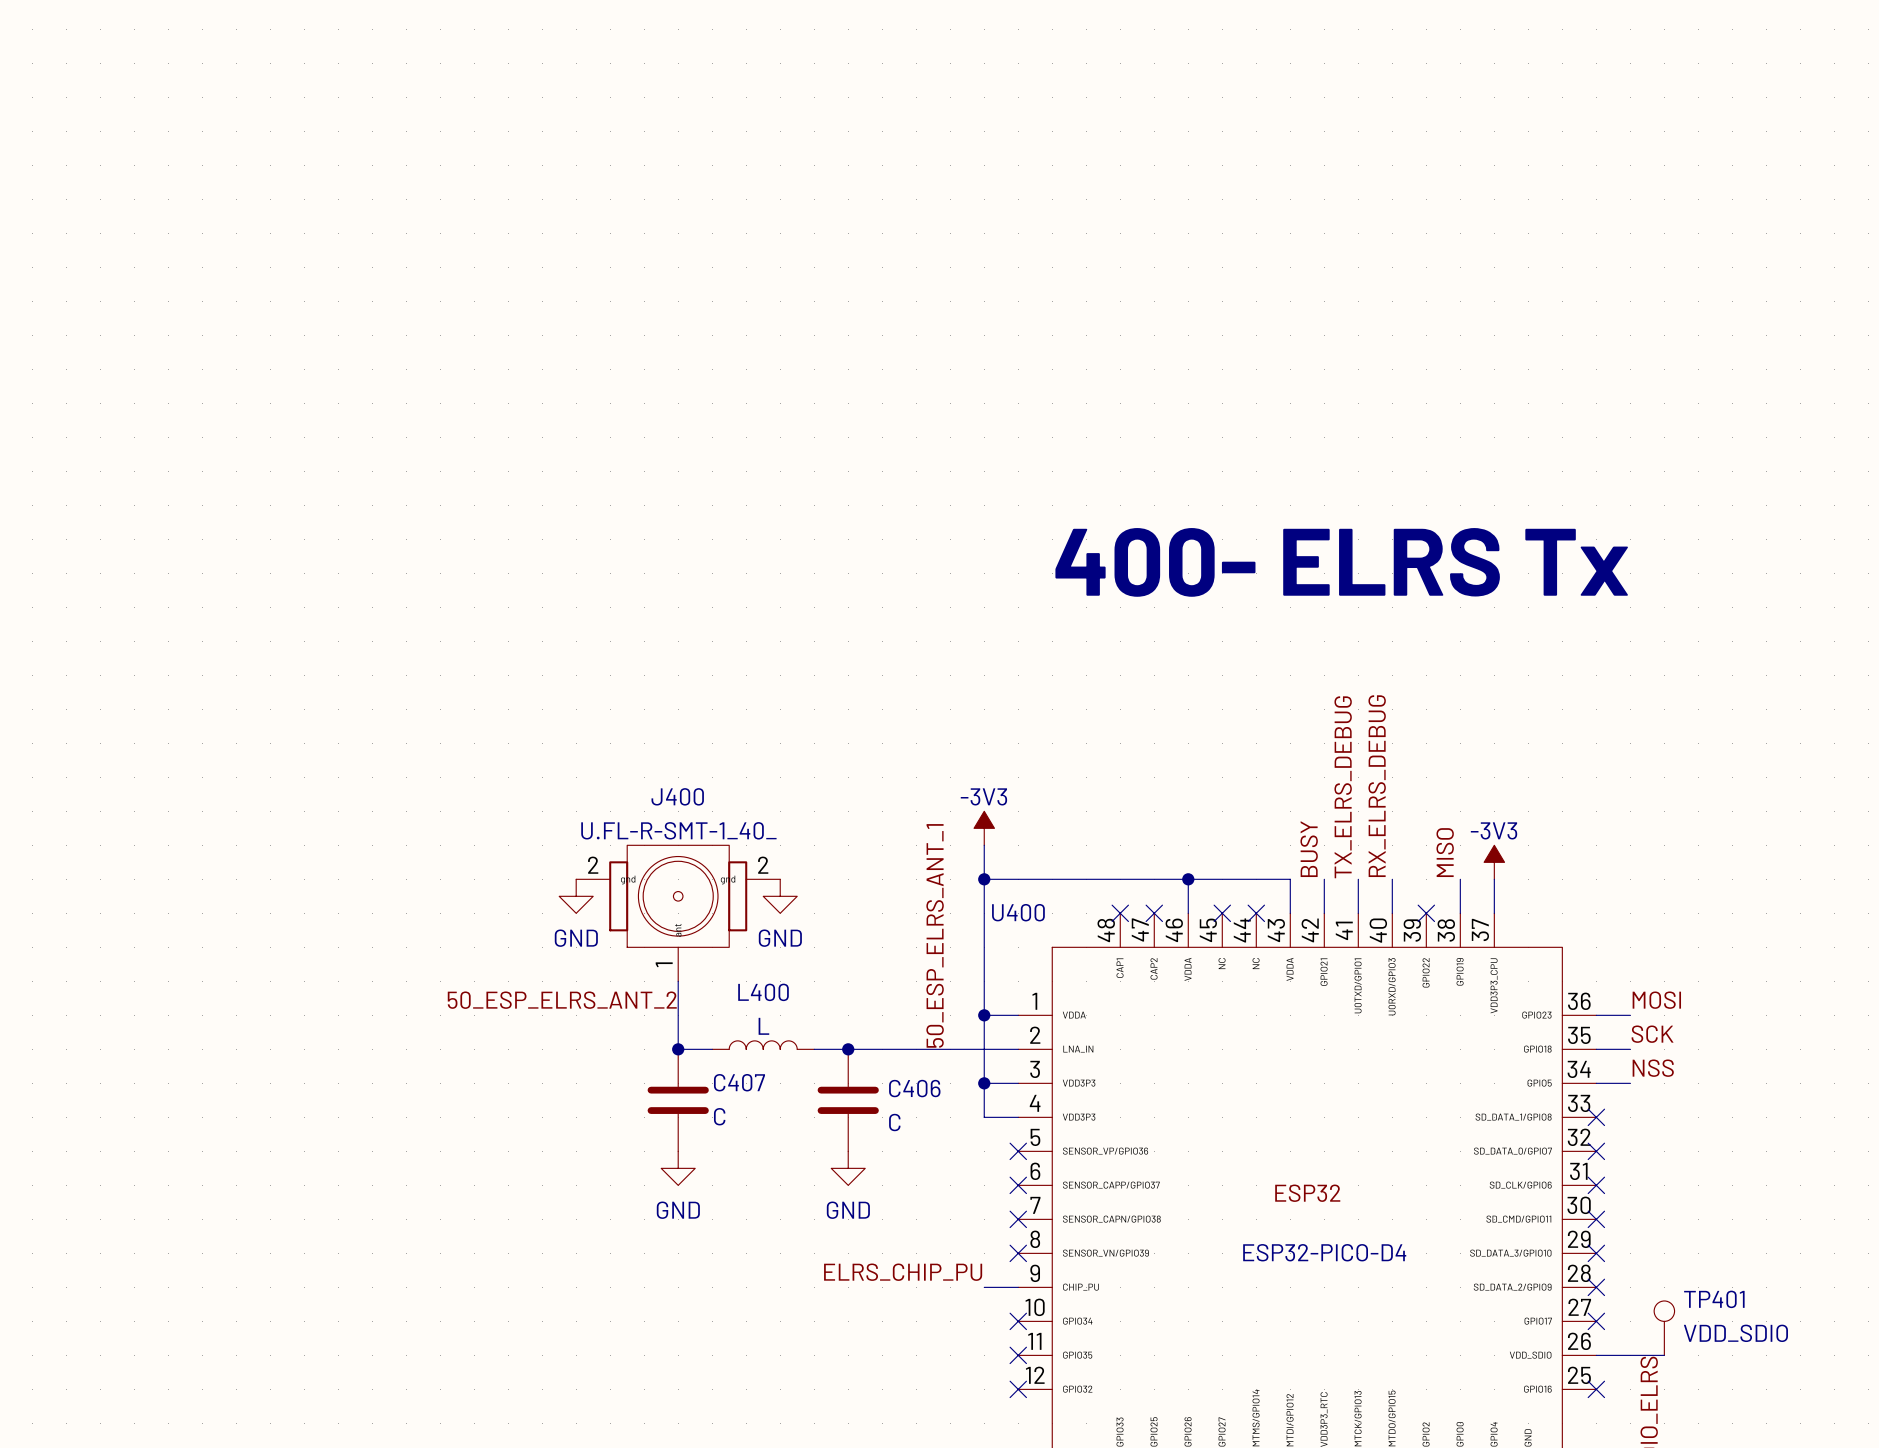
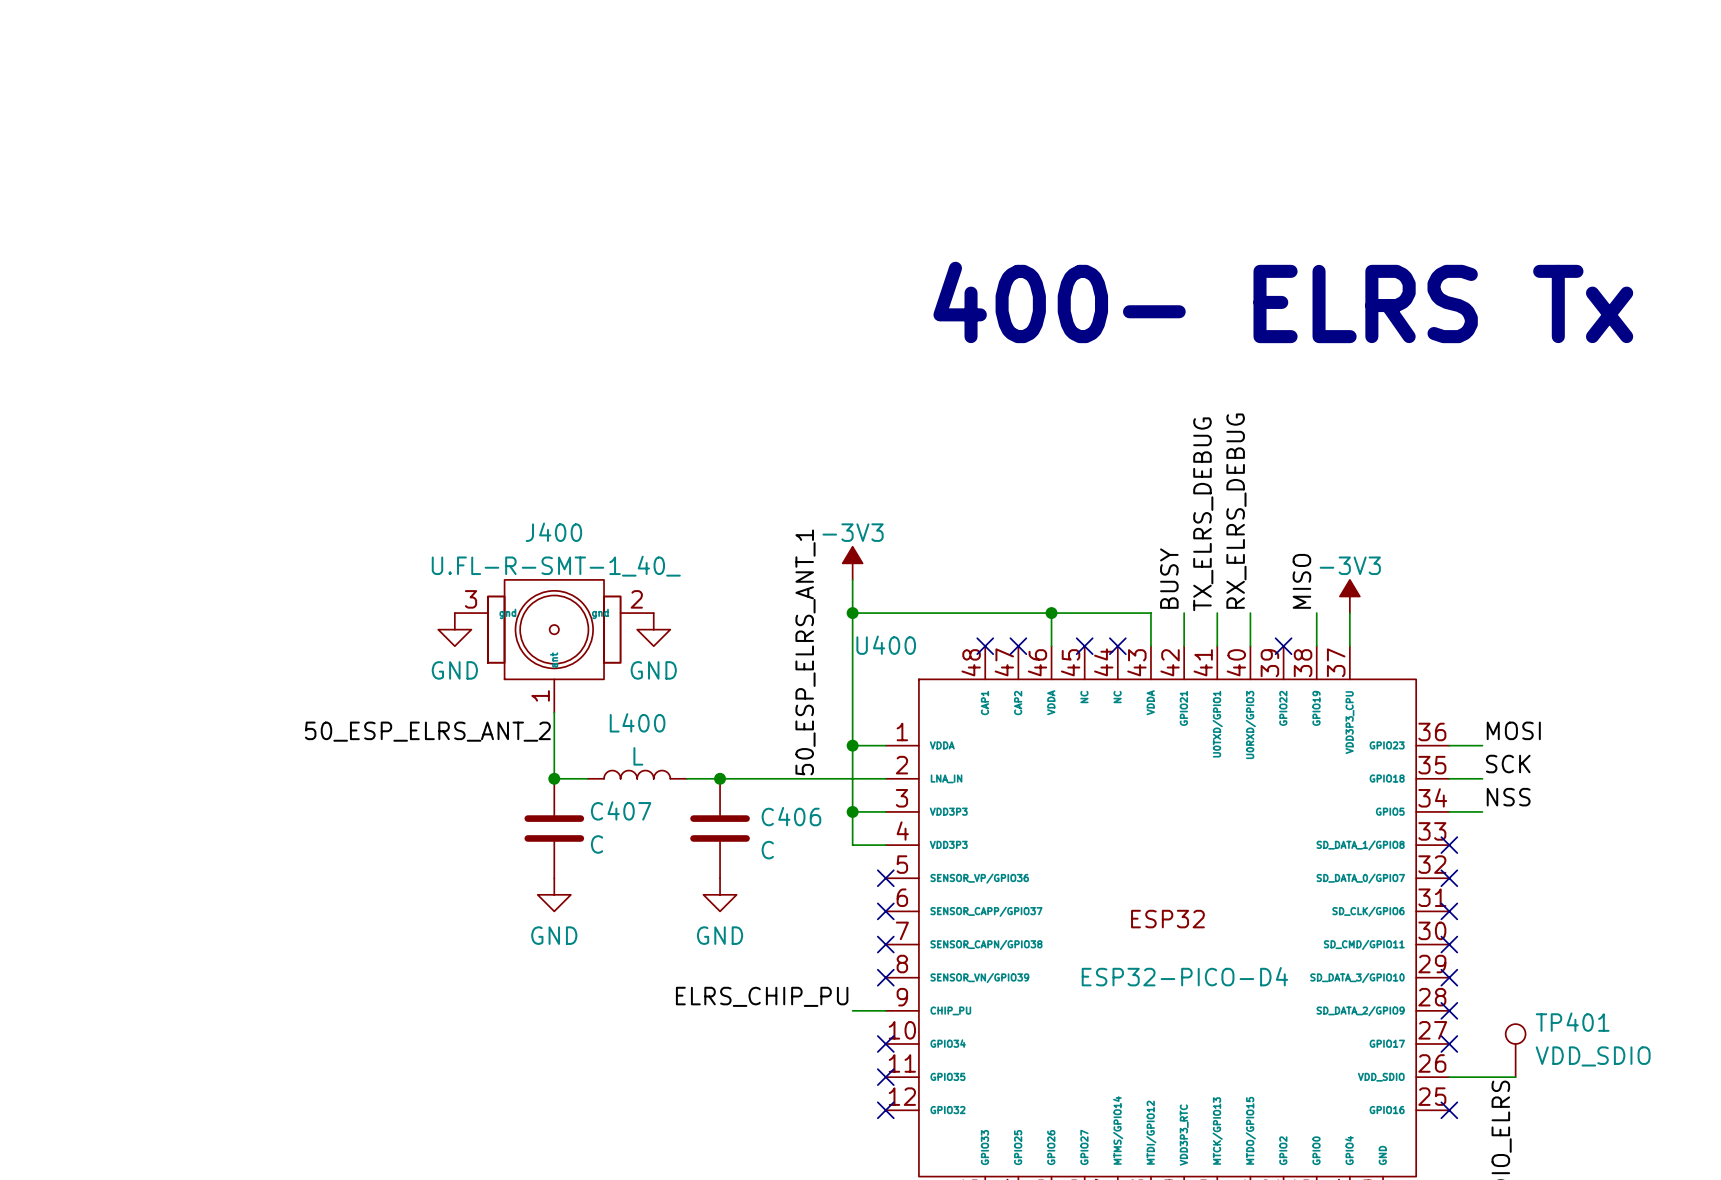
J400 pin number: 2 (593, 865) -> 3 (471, 599)

